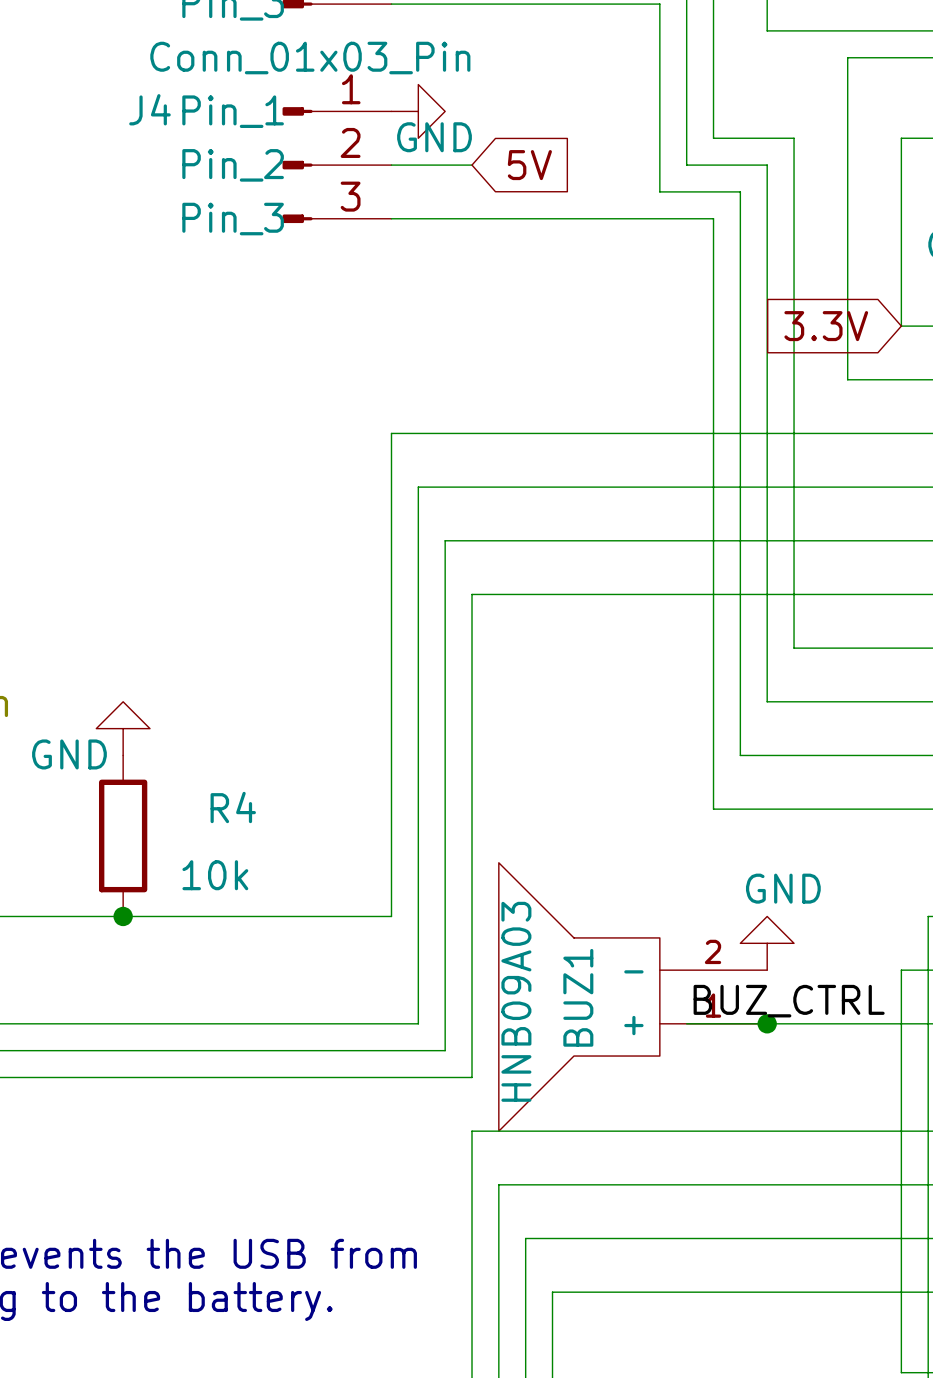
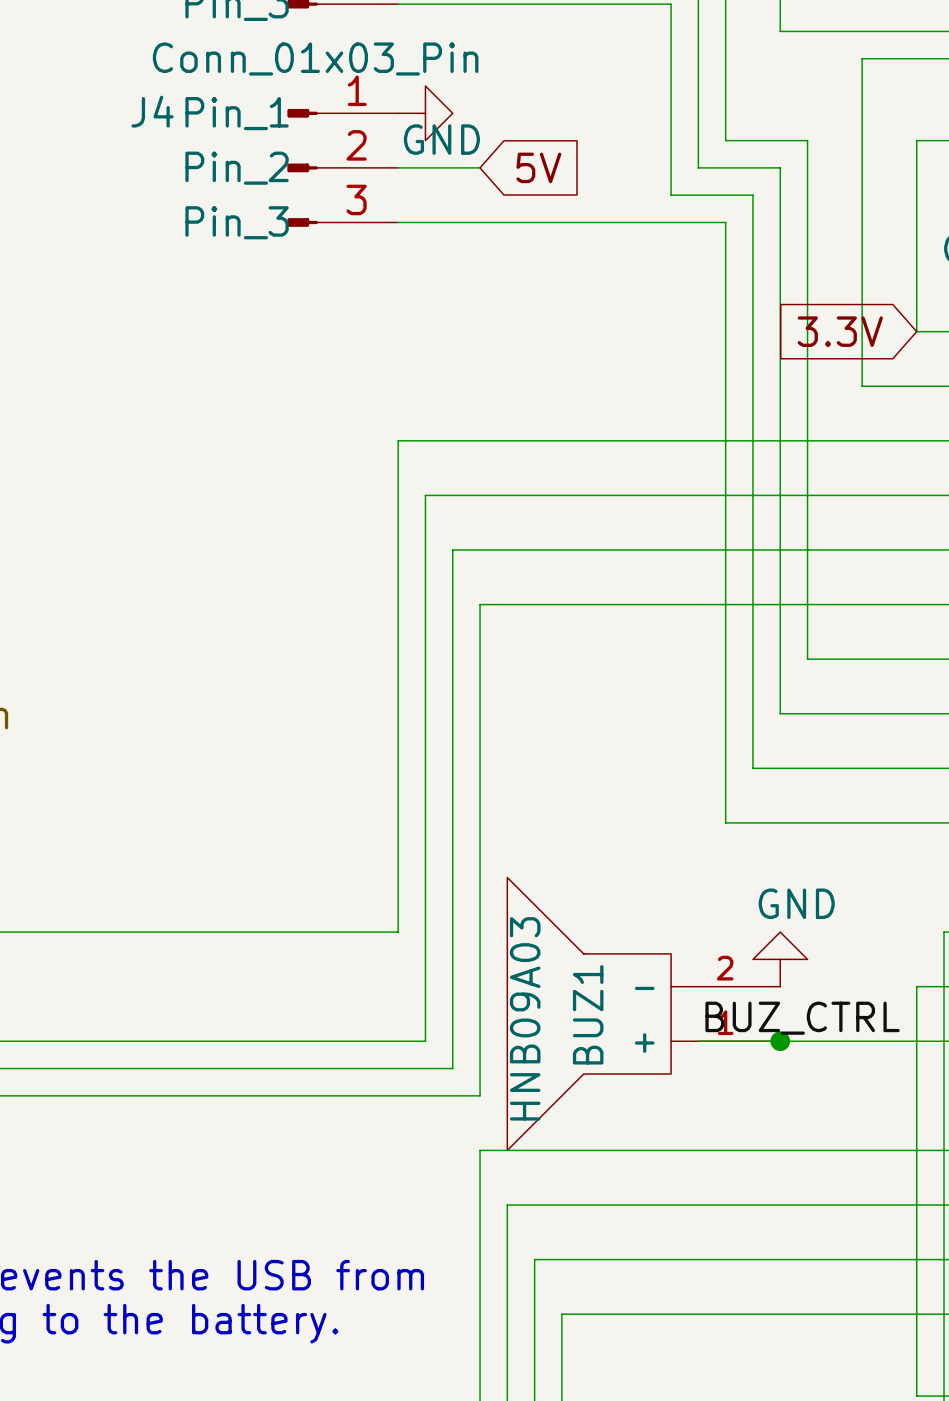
power symbol: GND (123, 728) -> none
R4: 10k (123, 835) -> none
junction: (123, 916) -> none

